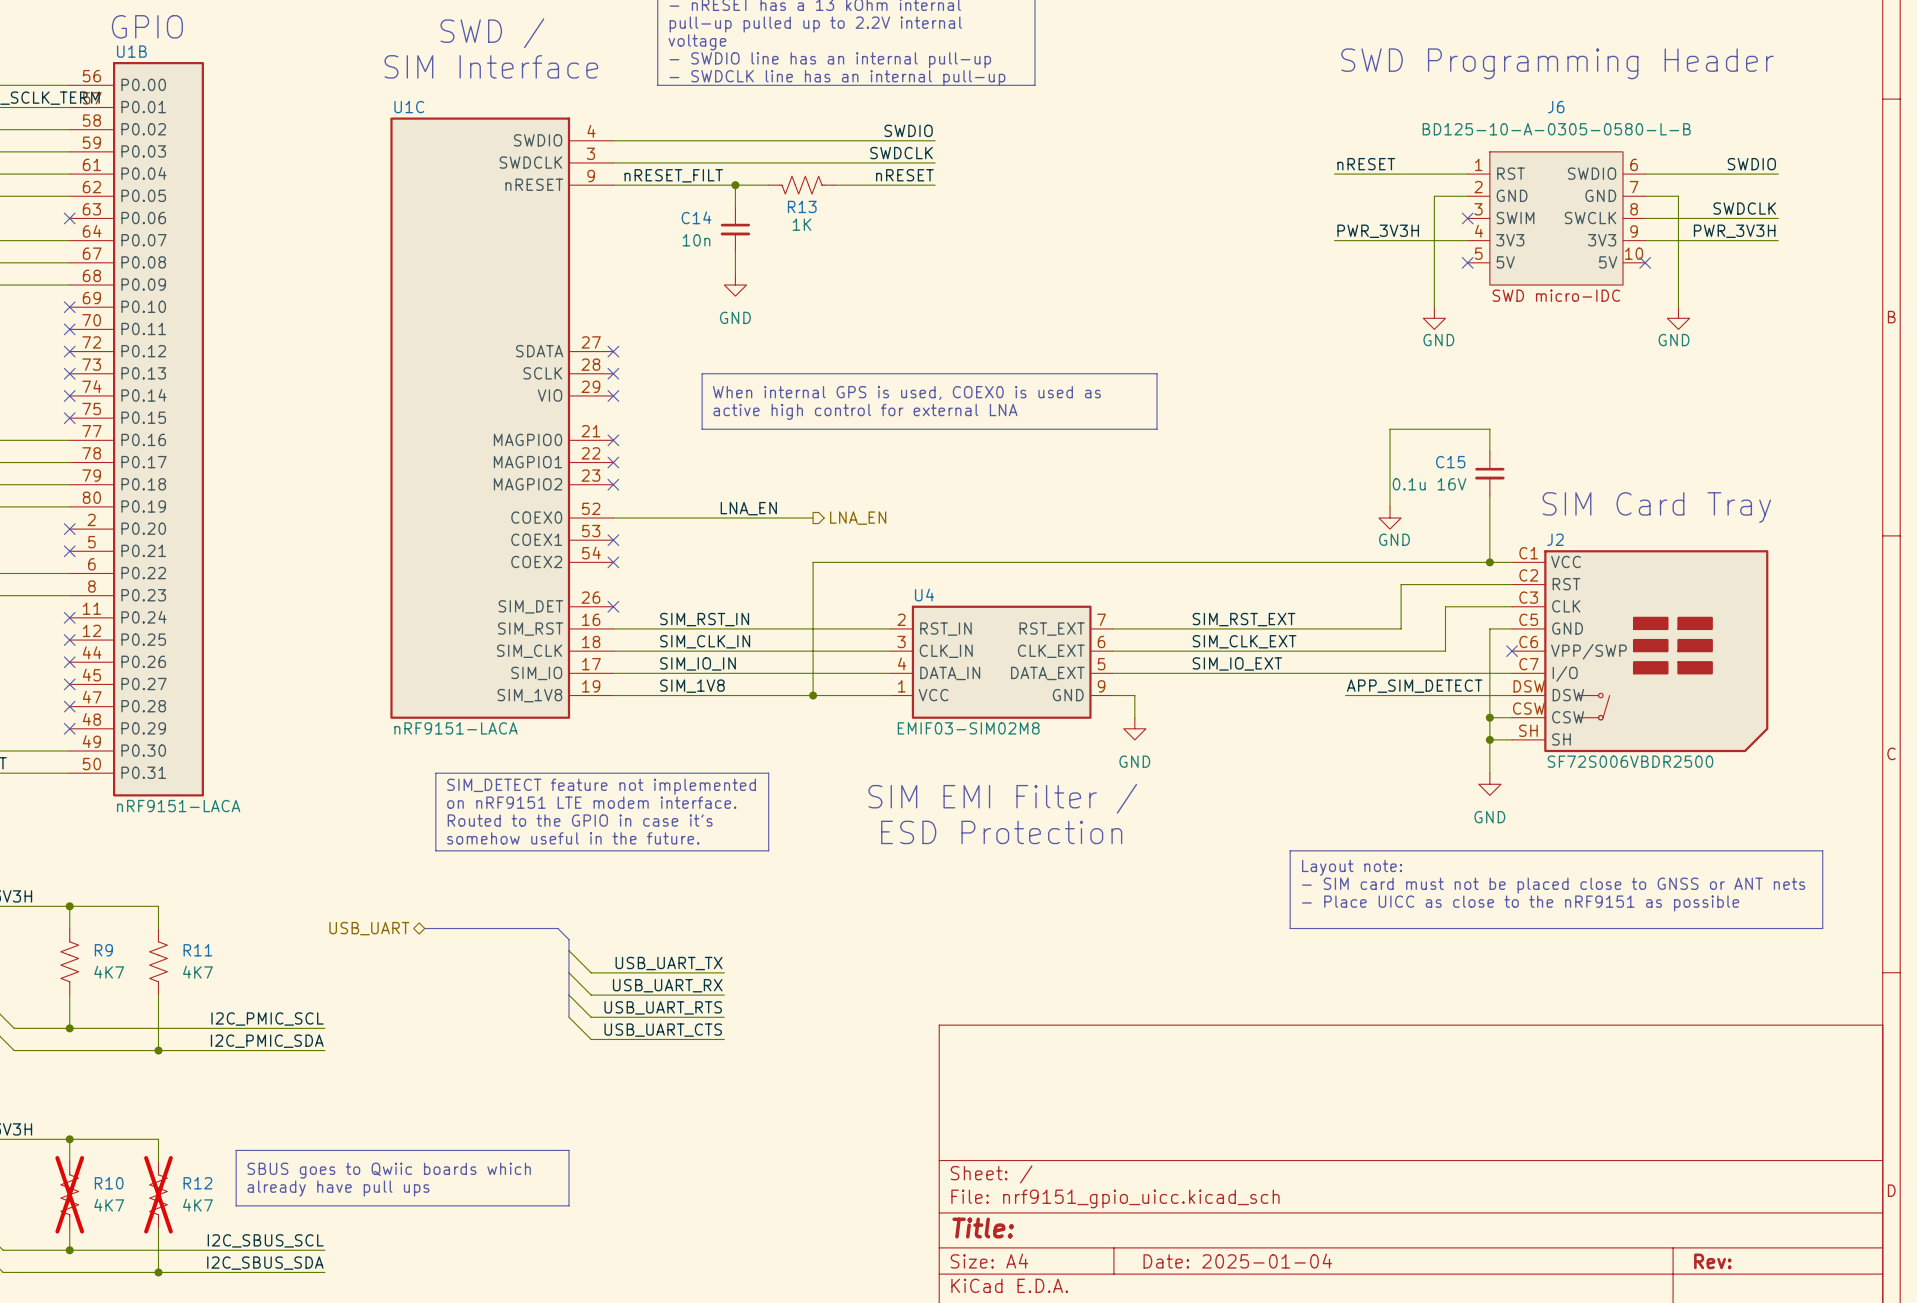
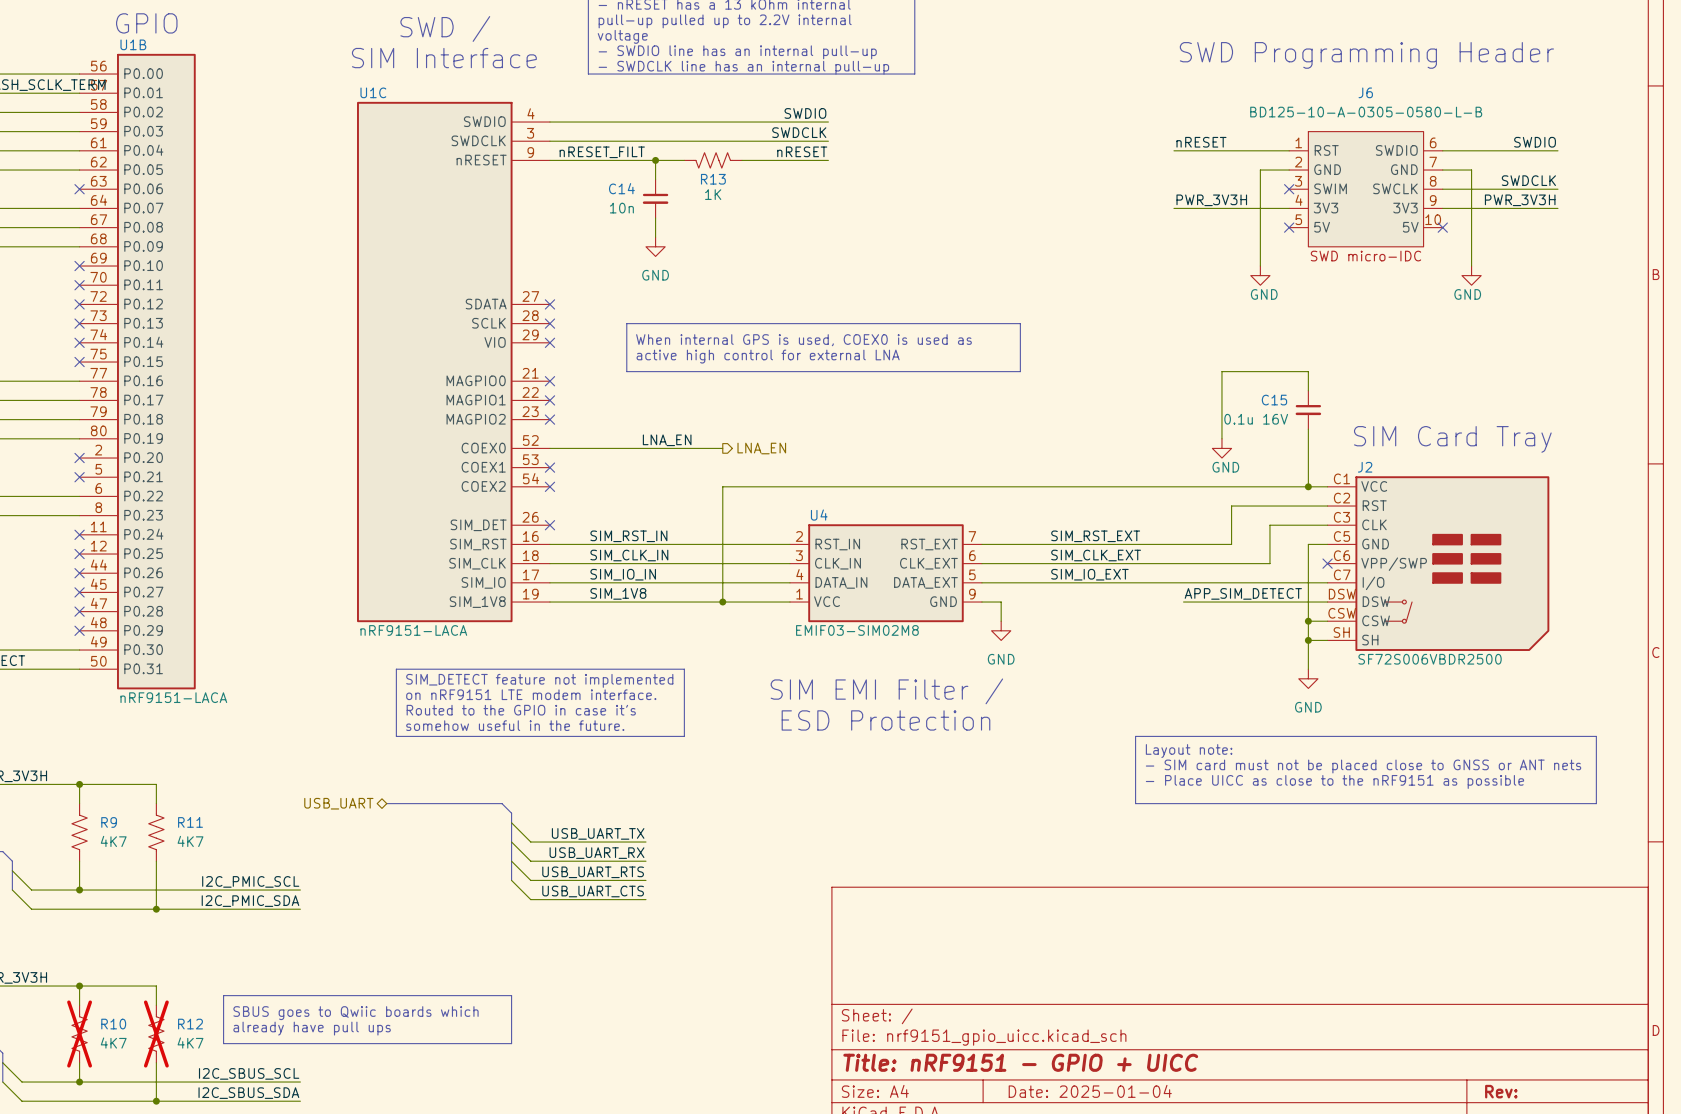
title block: Title: (983, 1228) -> Title: nRF9151 - GPIO + UICC (1020, 1062)

